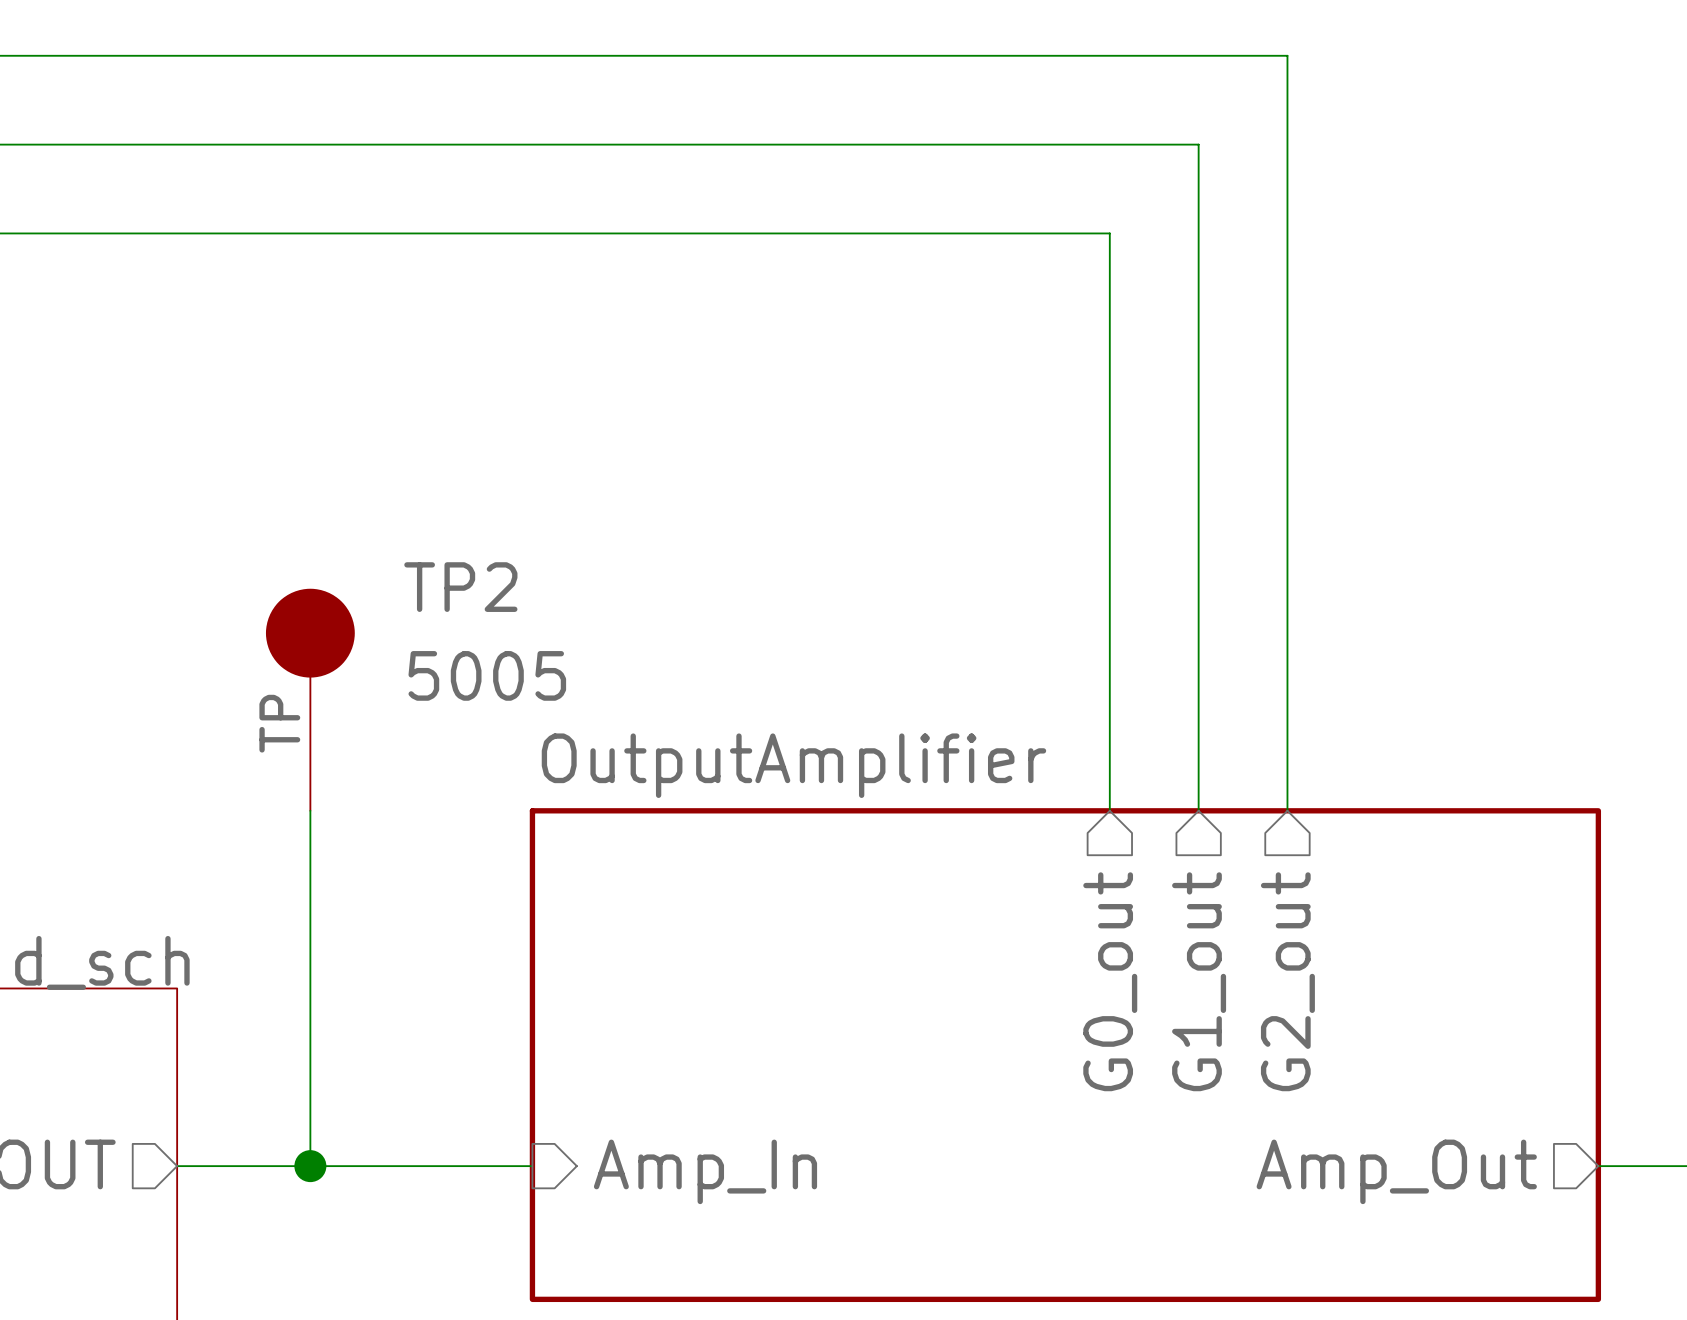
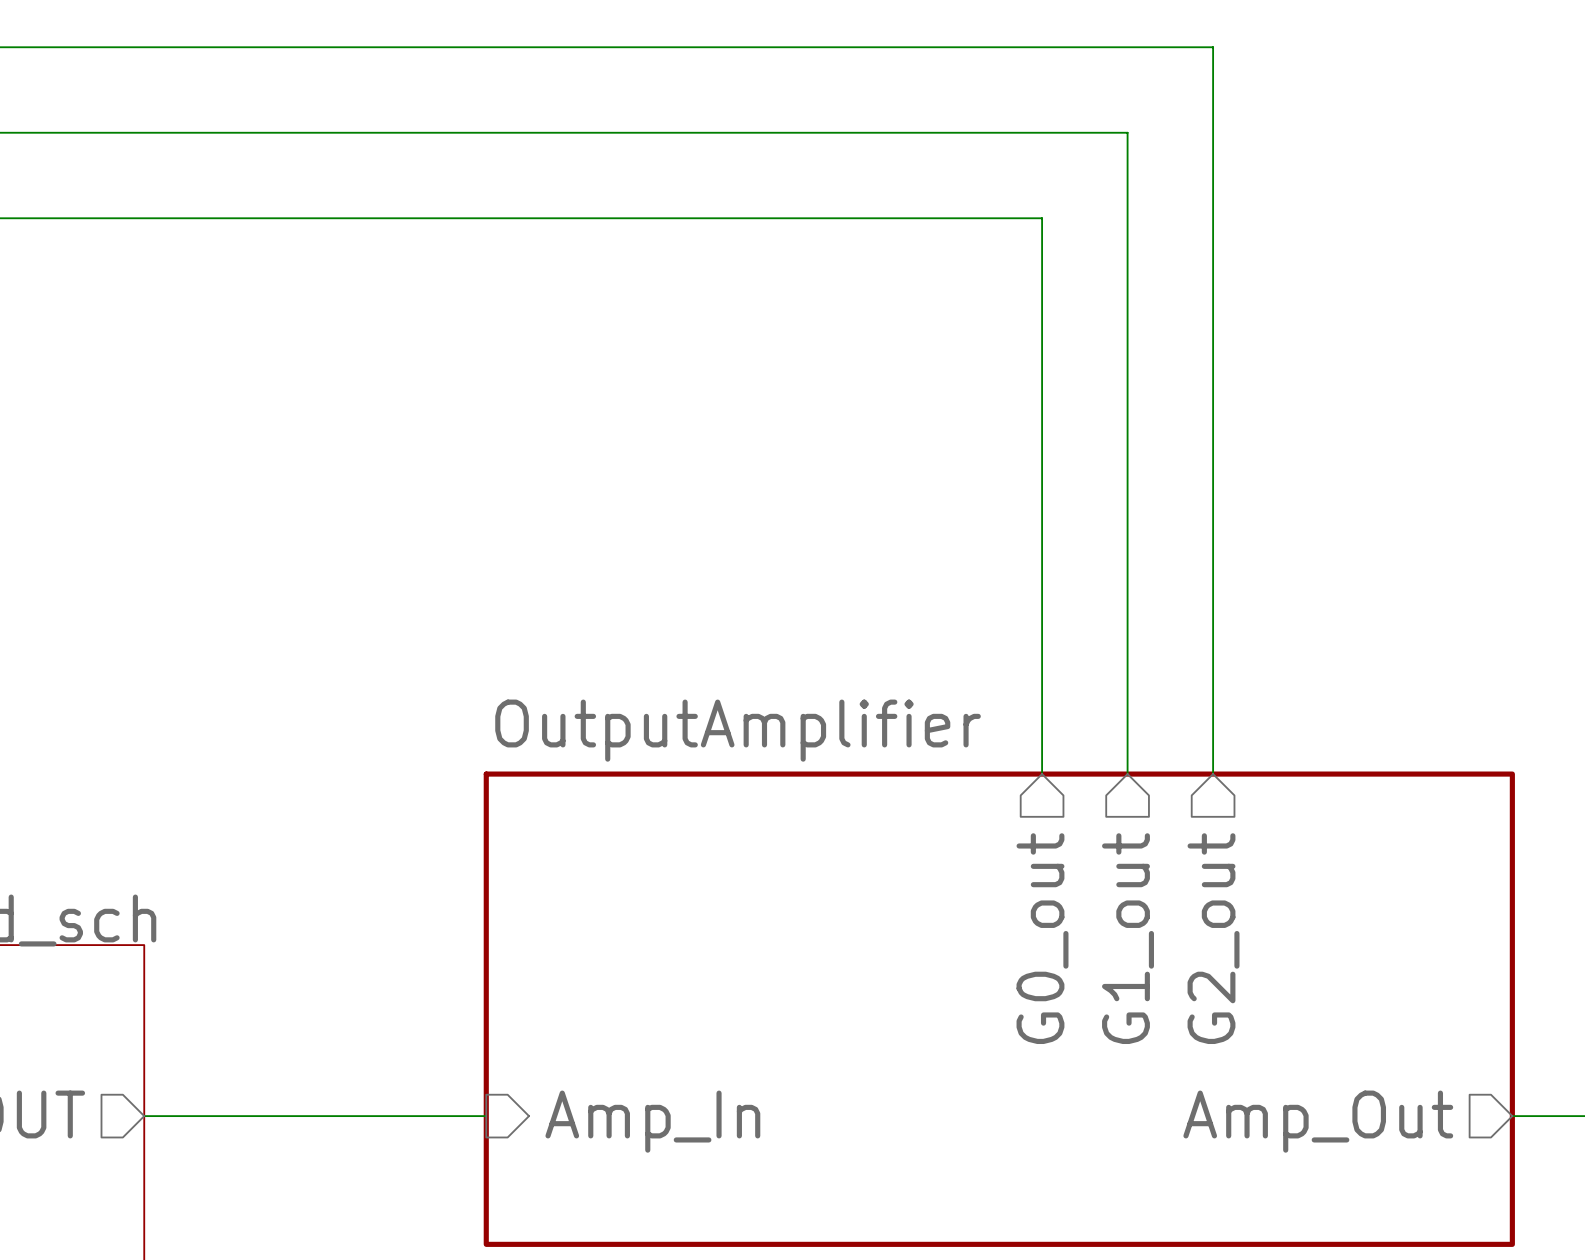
TP2: 5005 (310, 699) -> none
wire: (310, 810) (310, 1166) -> none
junction: (310, 1166) -> none

